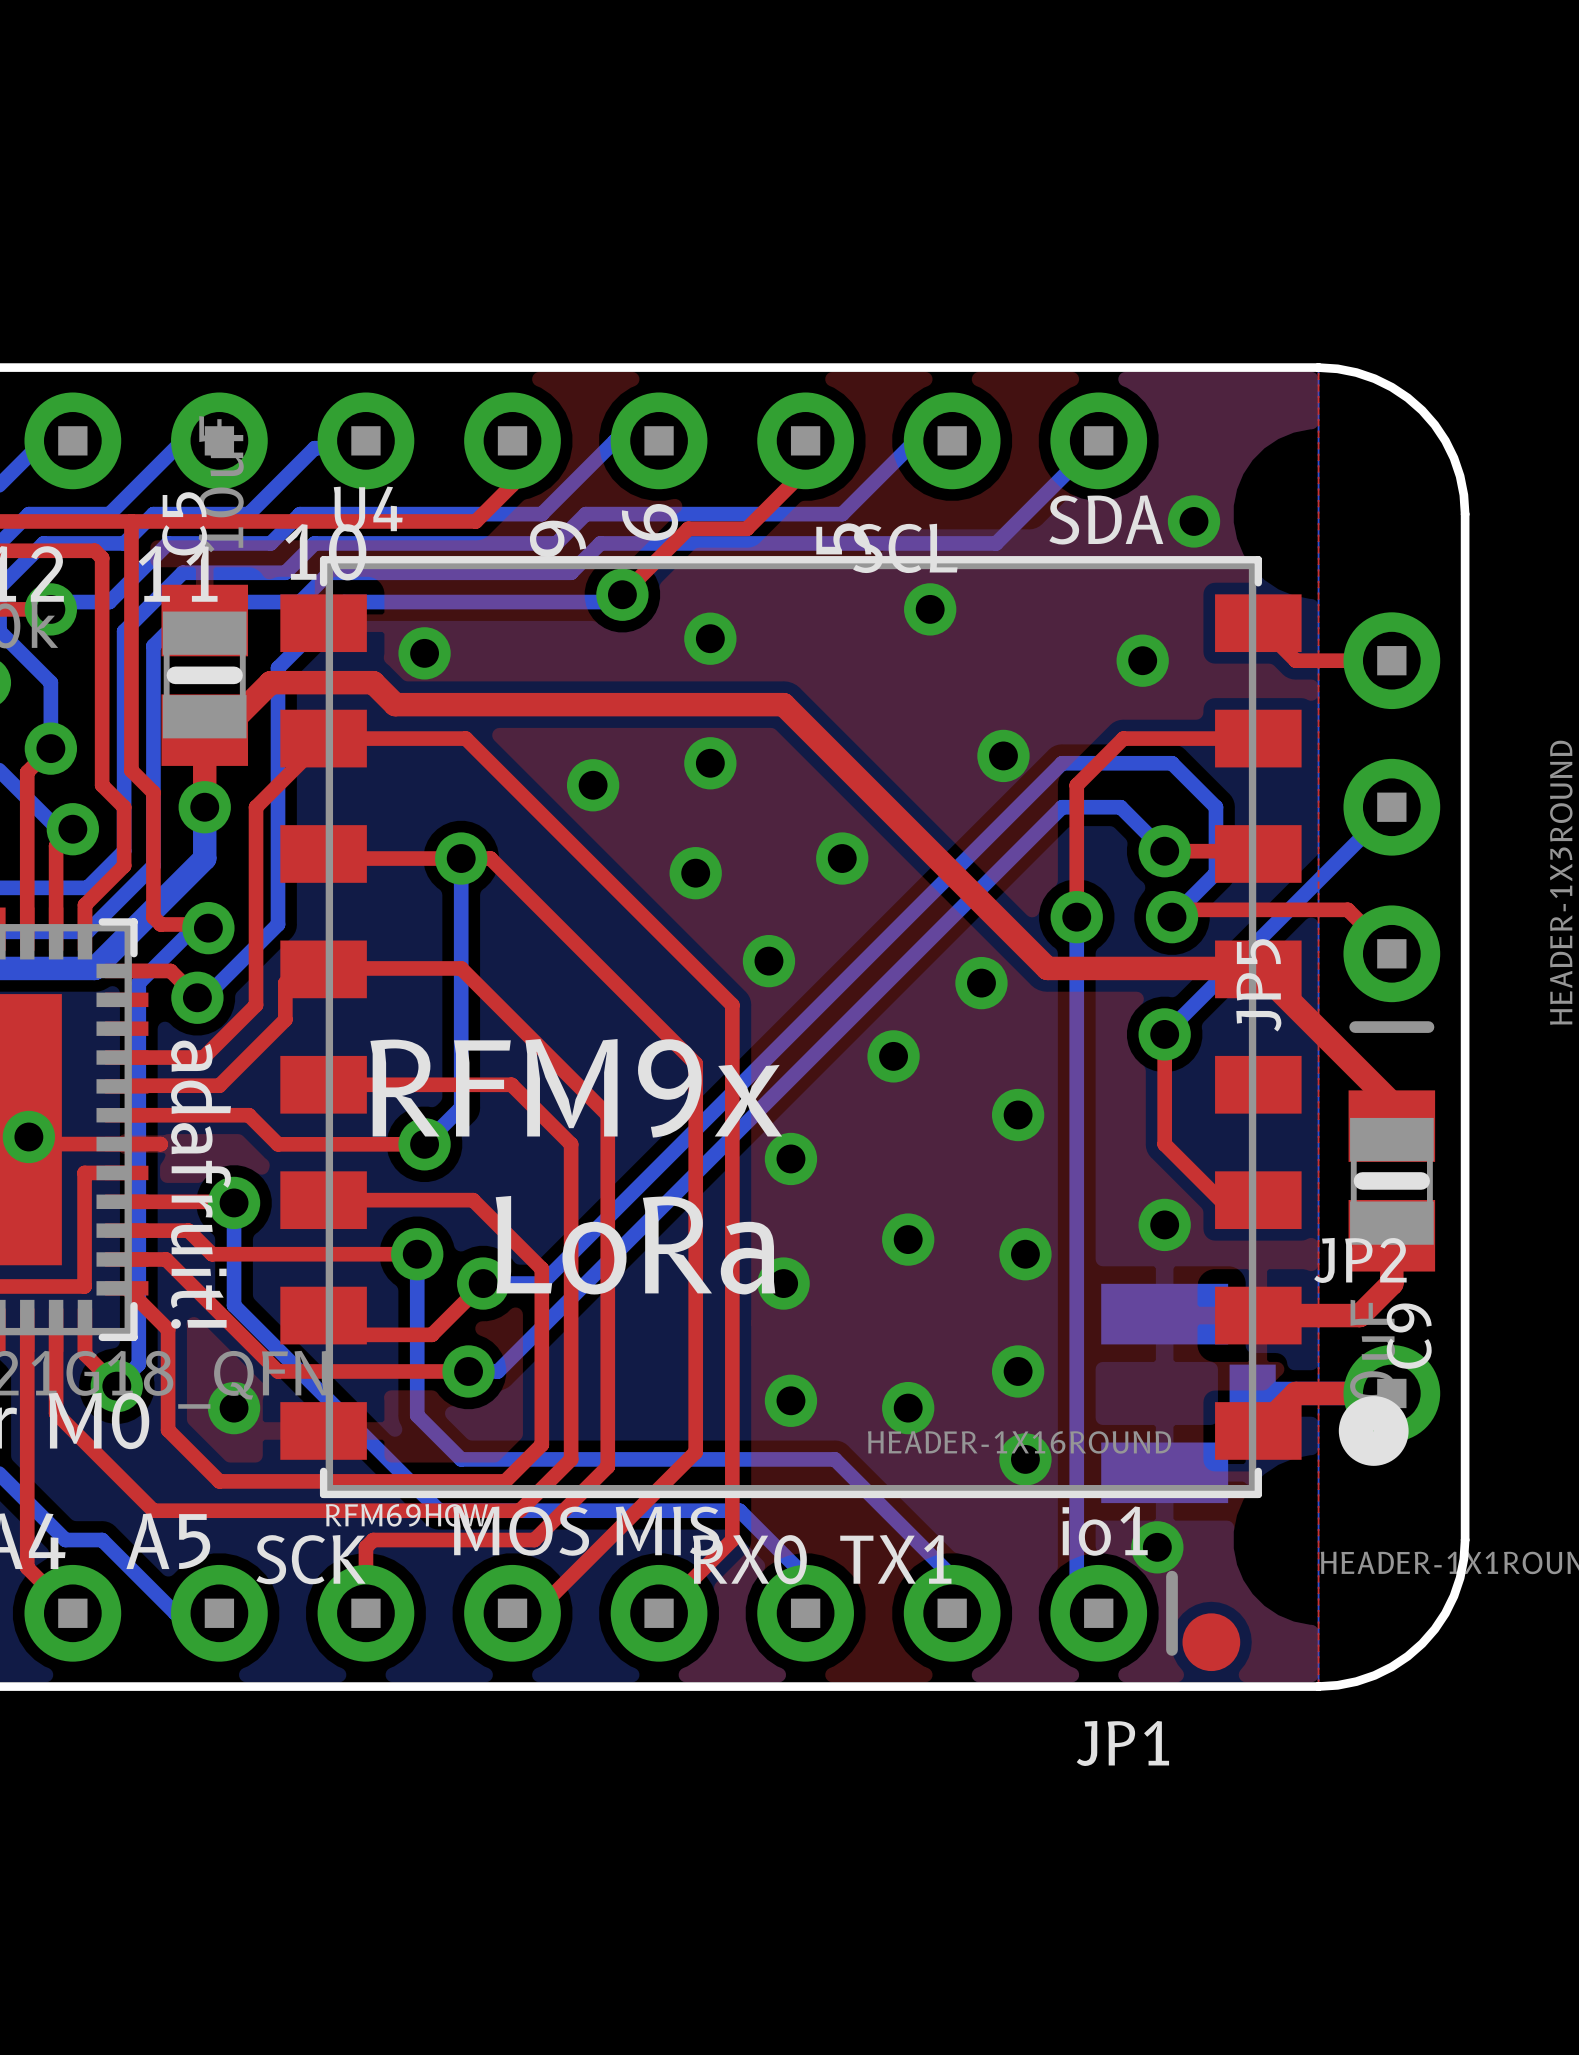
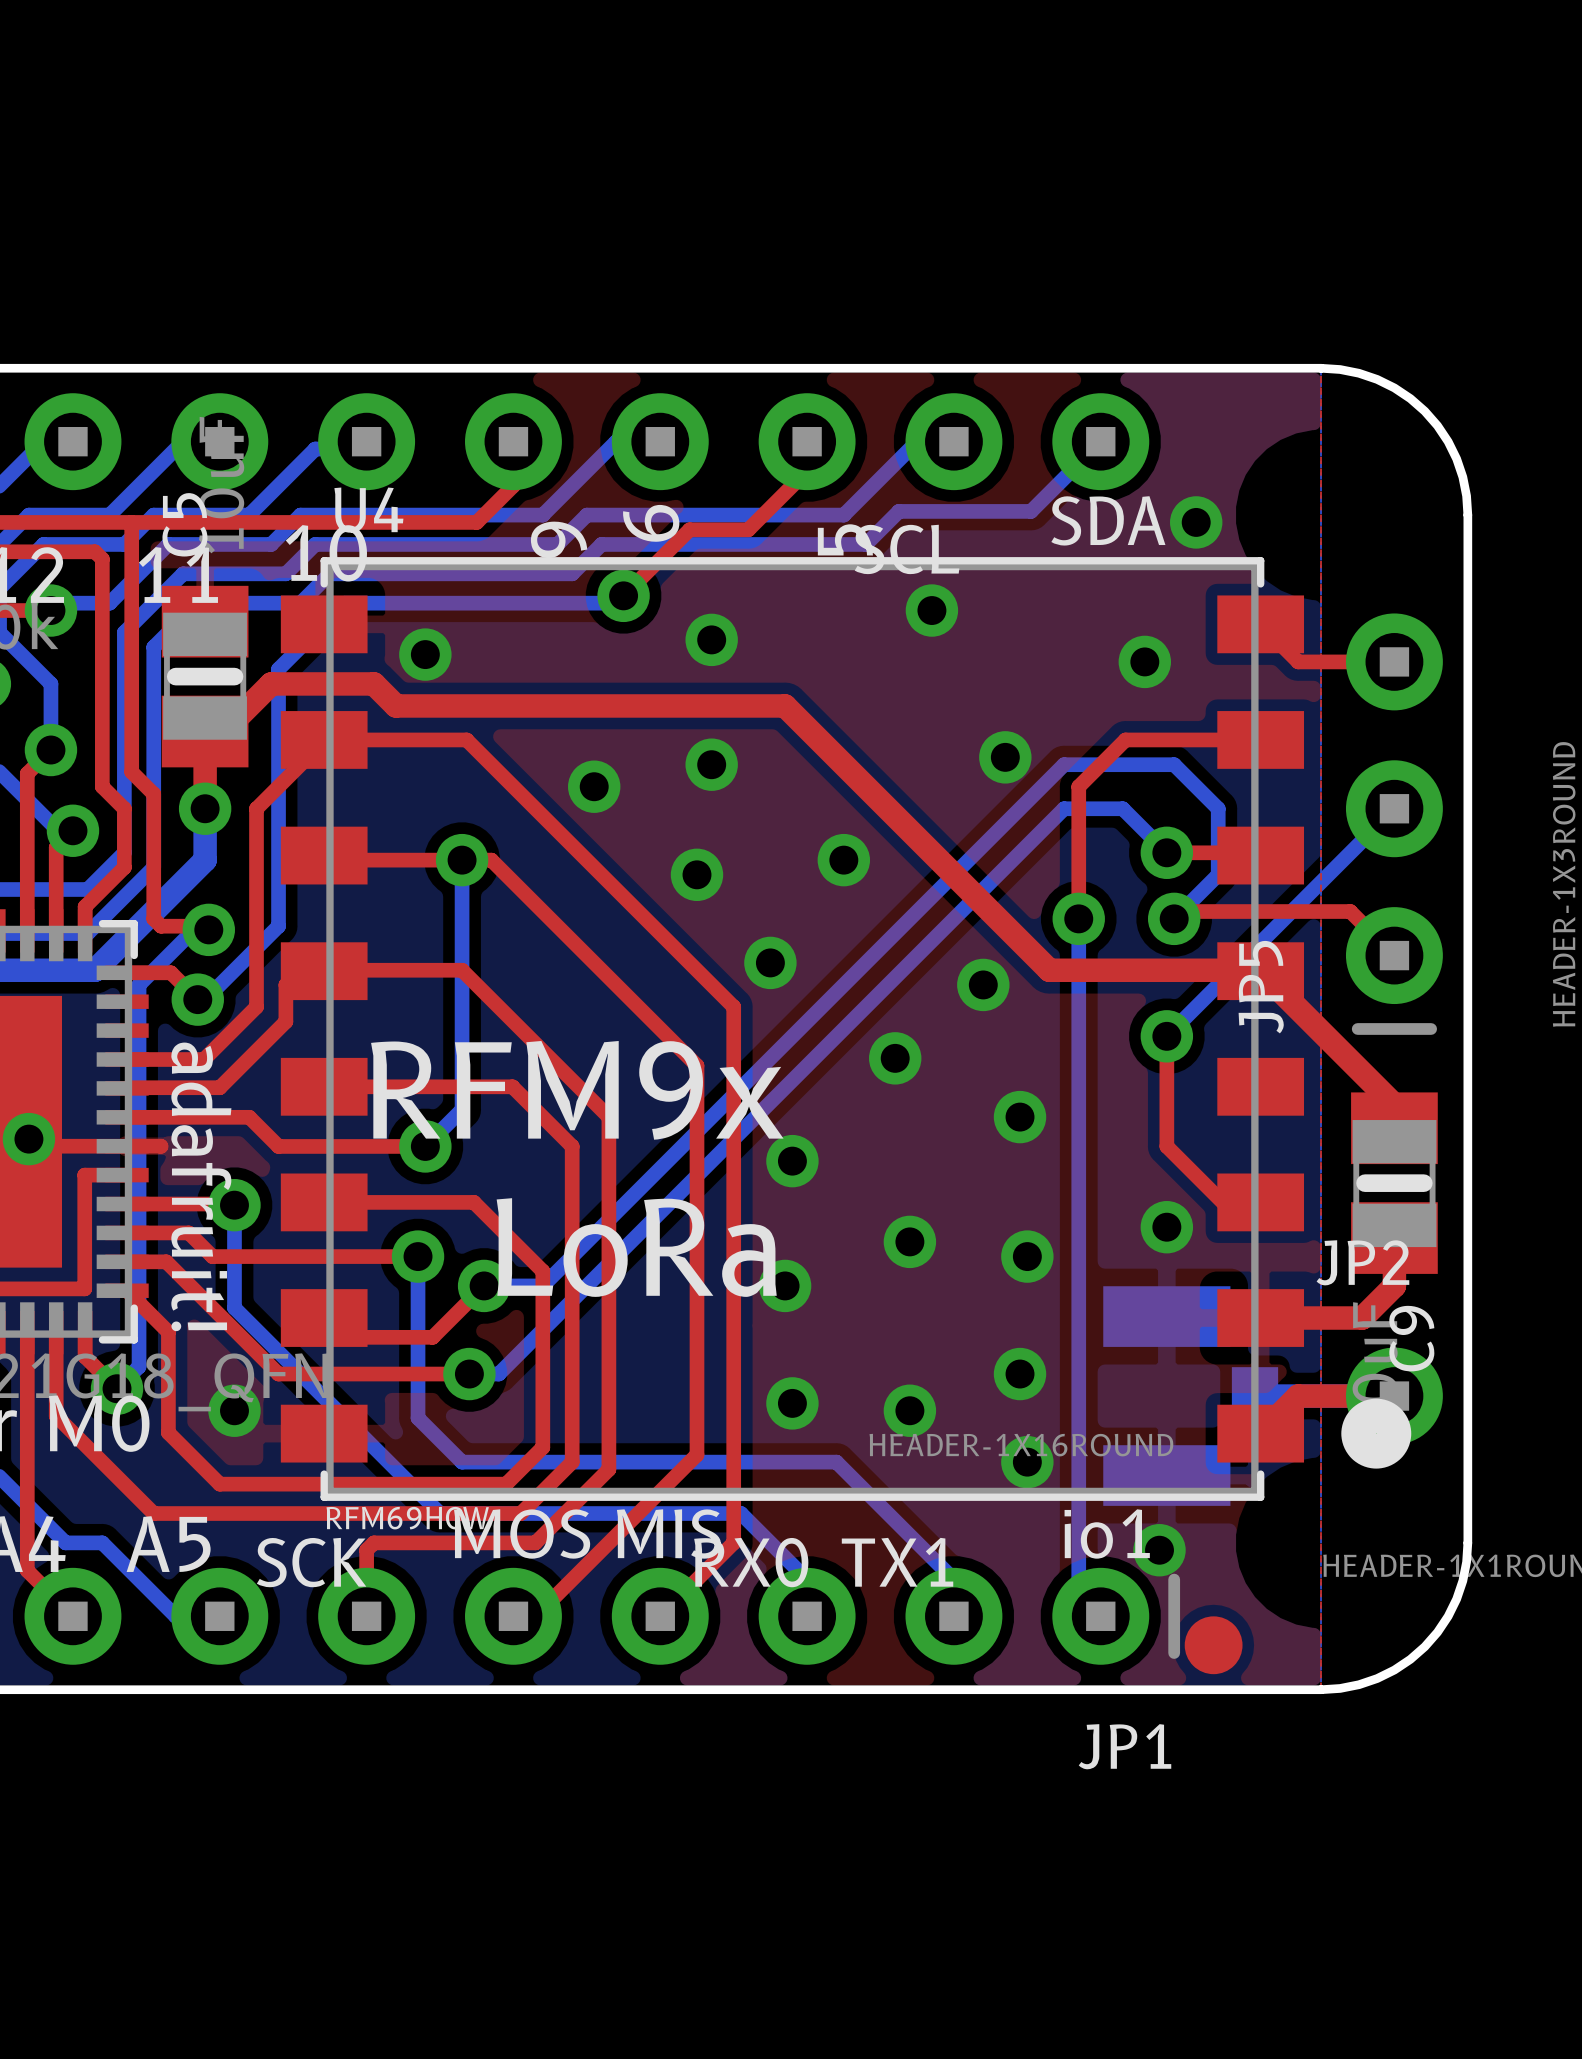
bottom track: (1029, 510) (996, 543) (864, 543) -> (1031, 511) (898, 511) (865, 544)

